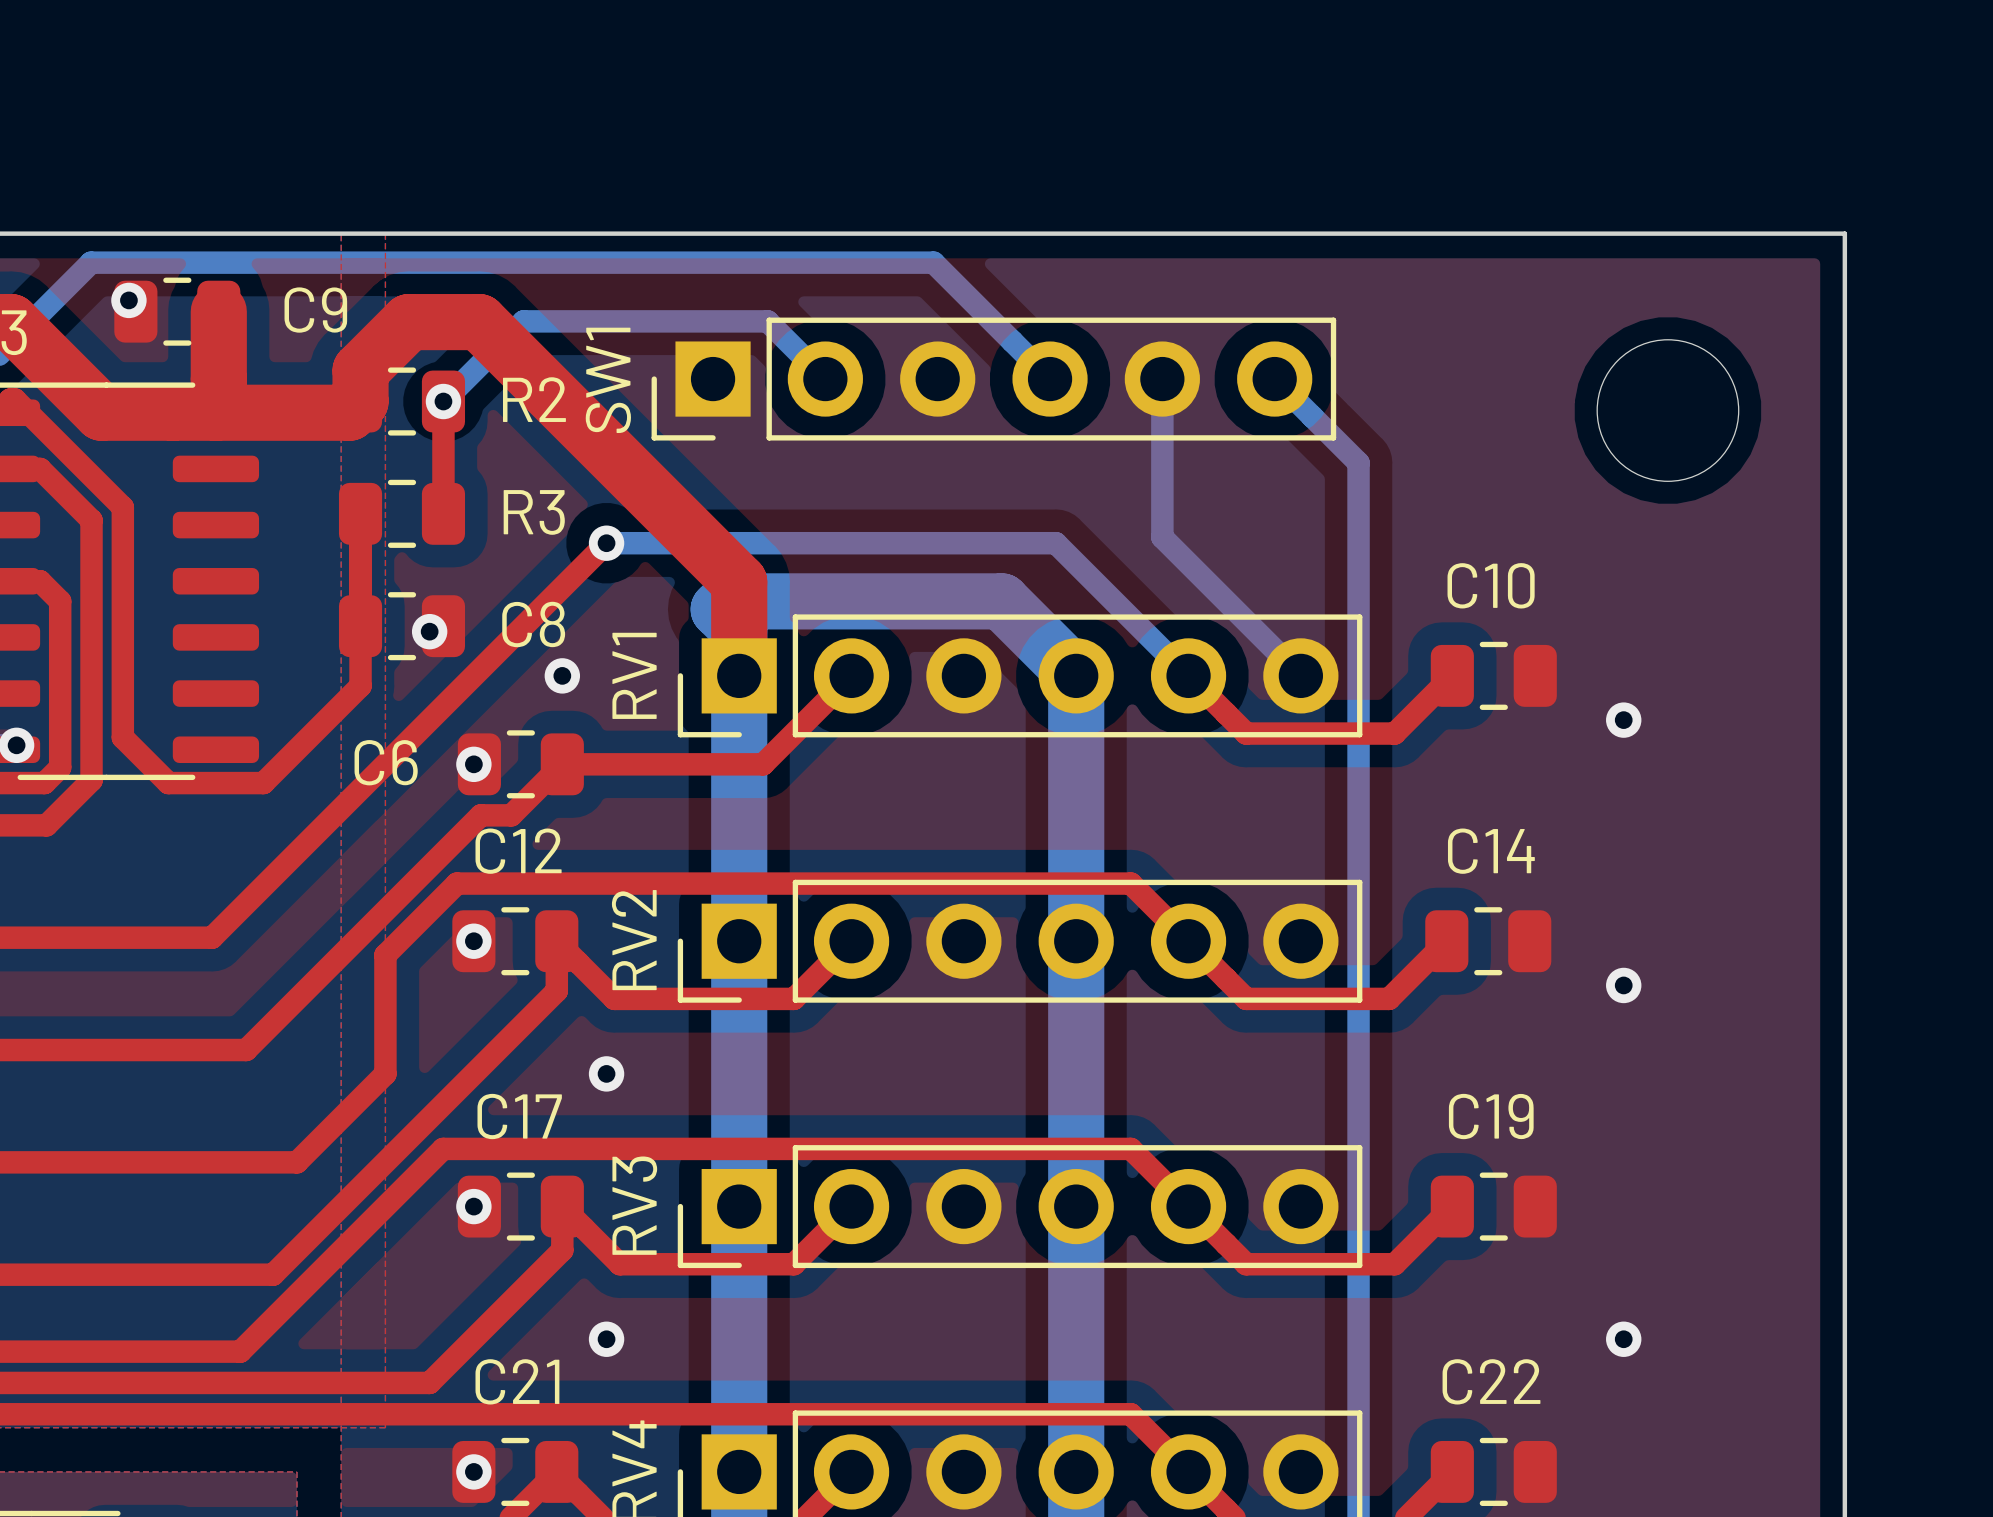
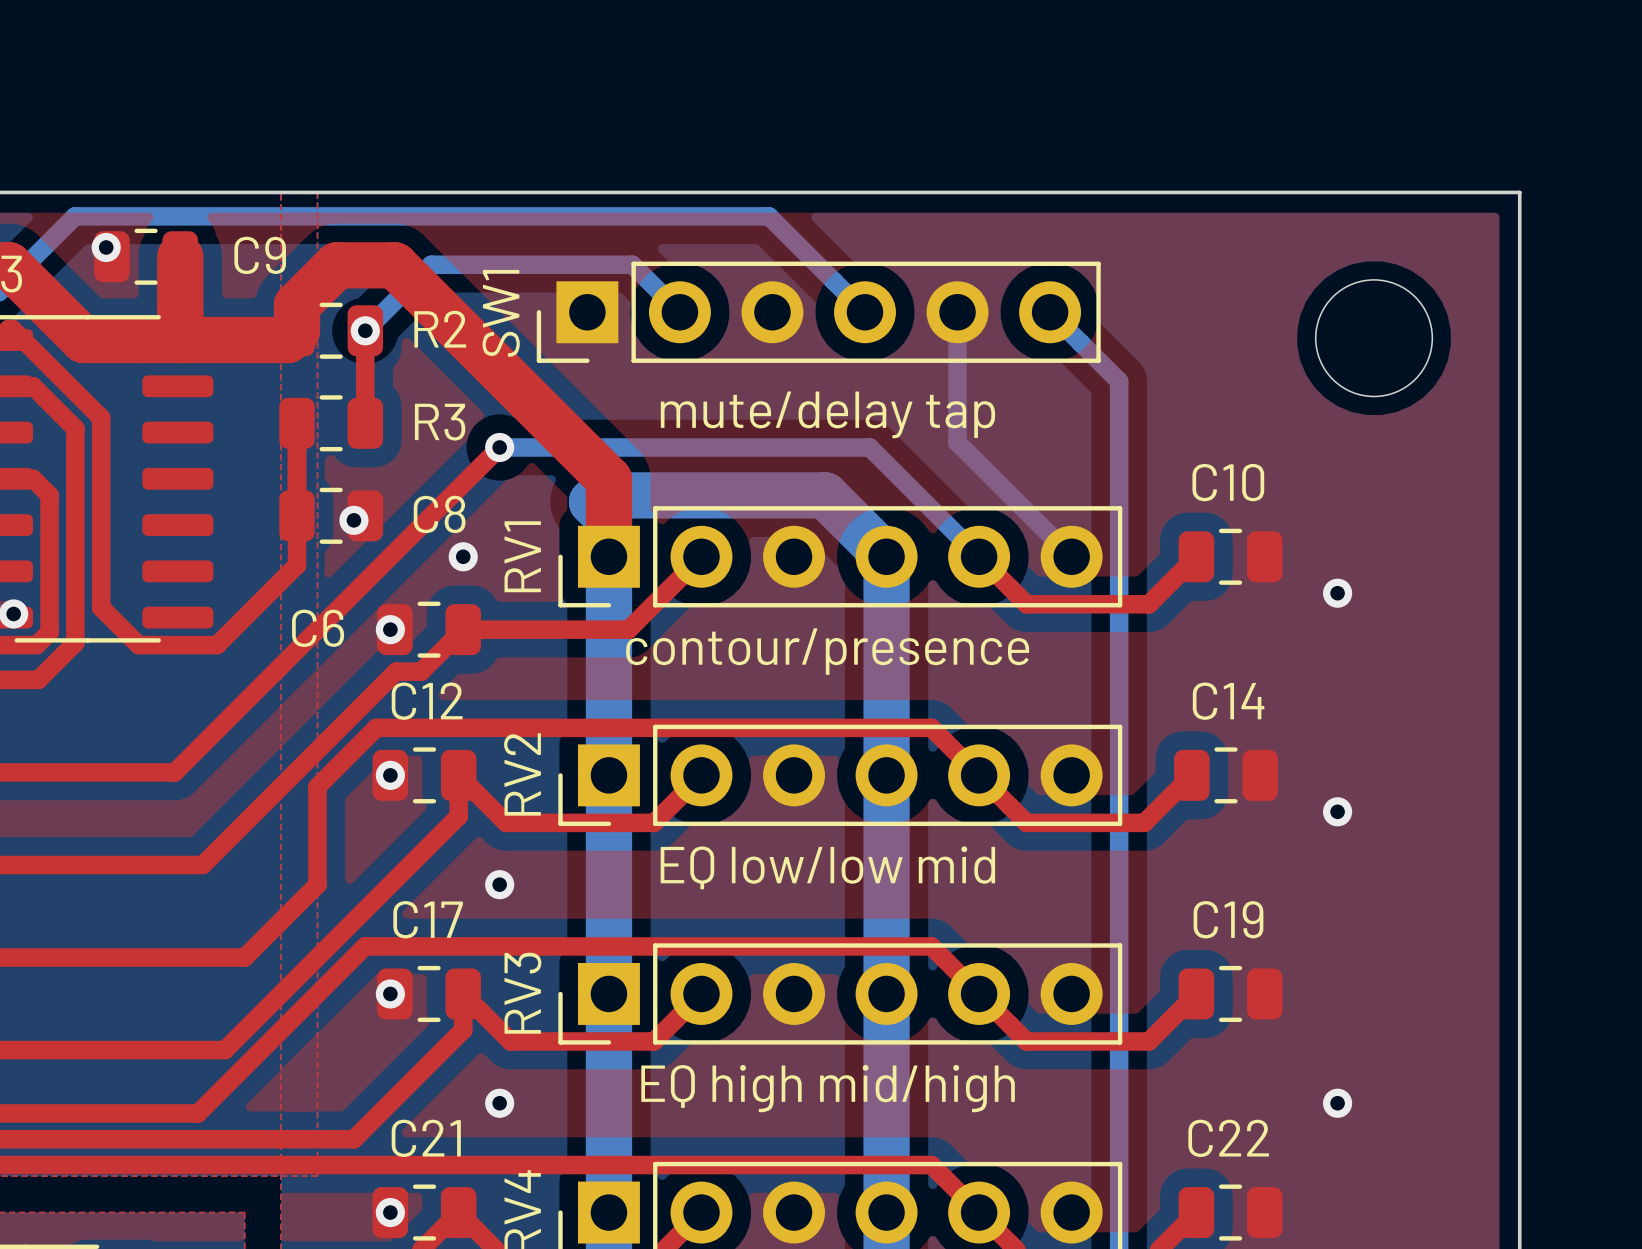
text: none -> mute/delay tap (827, 414)
text: none -> contour/presence (827, 651)
text: none -> EQ low/low mid (827, 867)
text: none -> EQ high mid/high (828, 1088)

